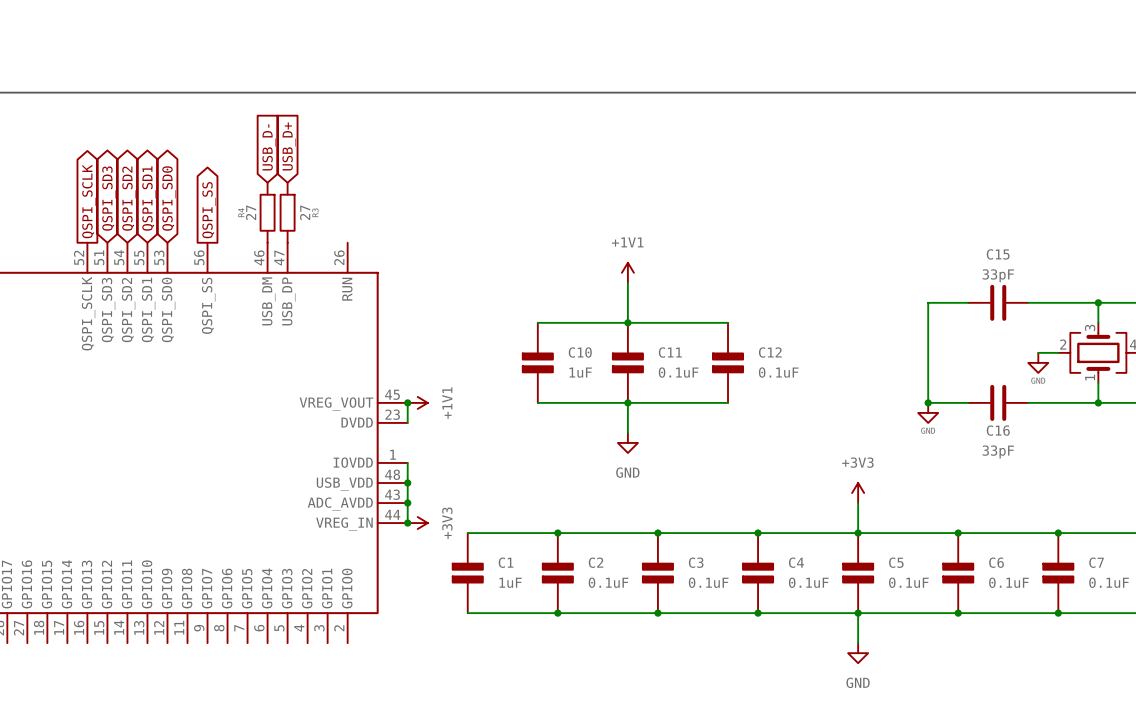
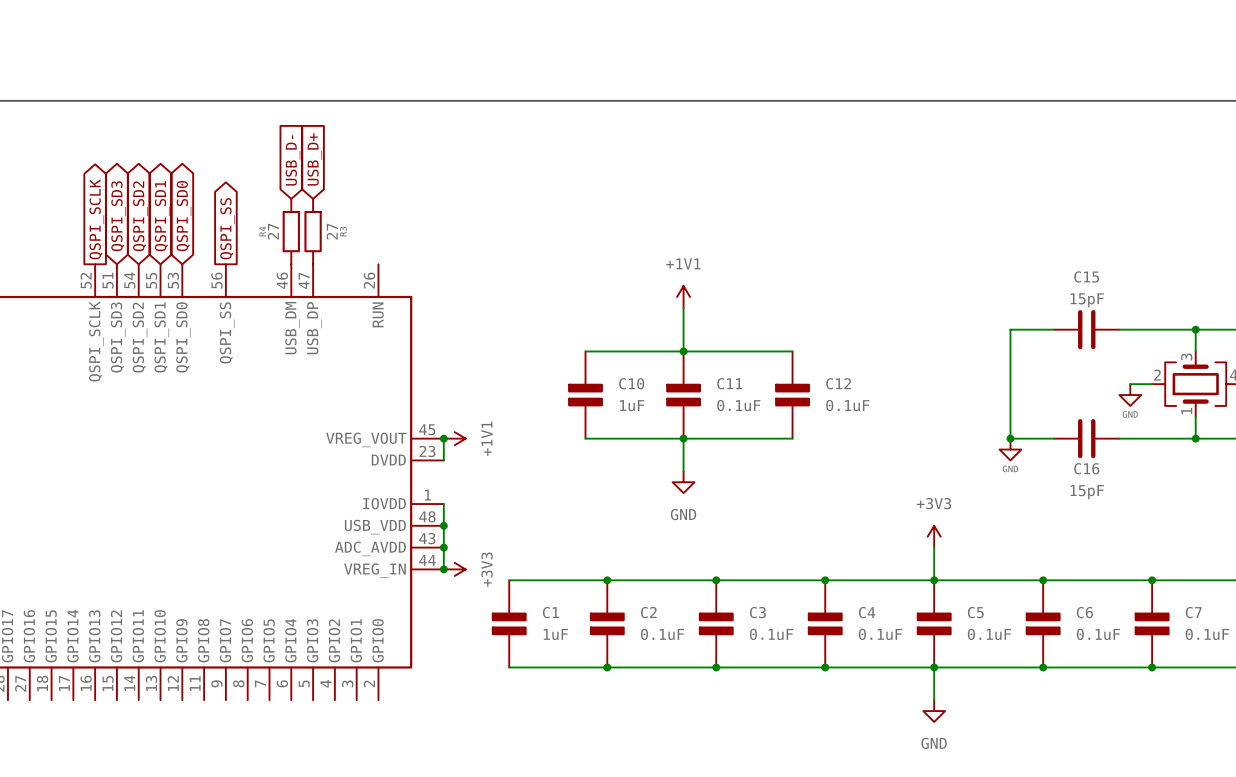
C15 value: 33pF (998, 275) -> 15pF (1087, 300)
C16 value: 33pF (998, 451) -> 15pF (1087, 492)

